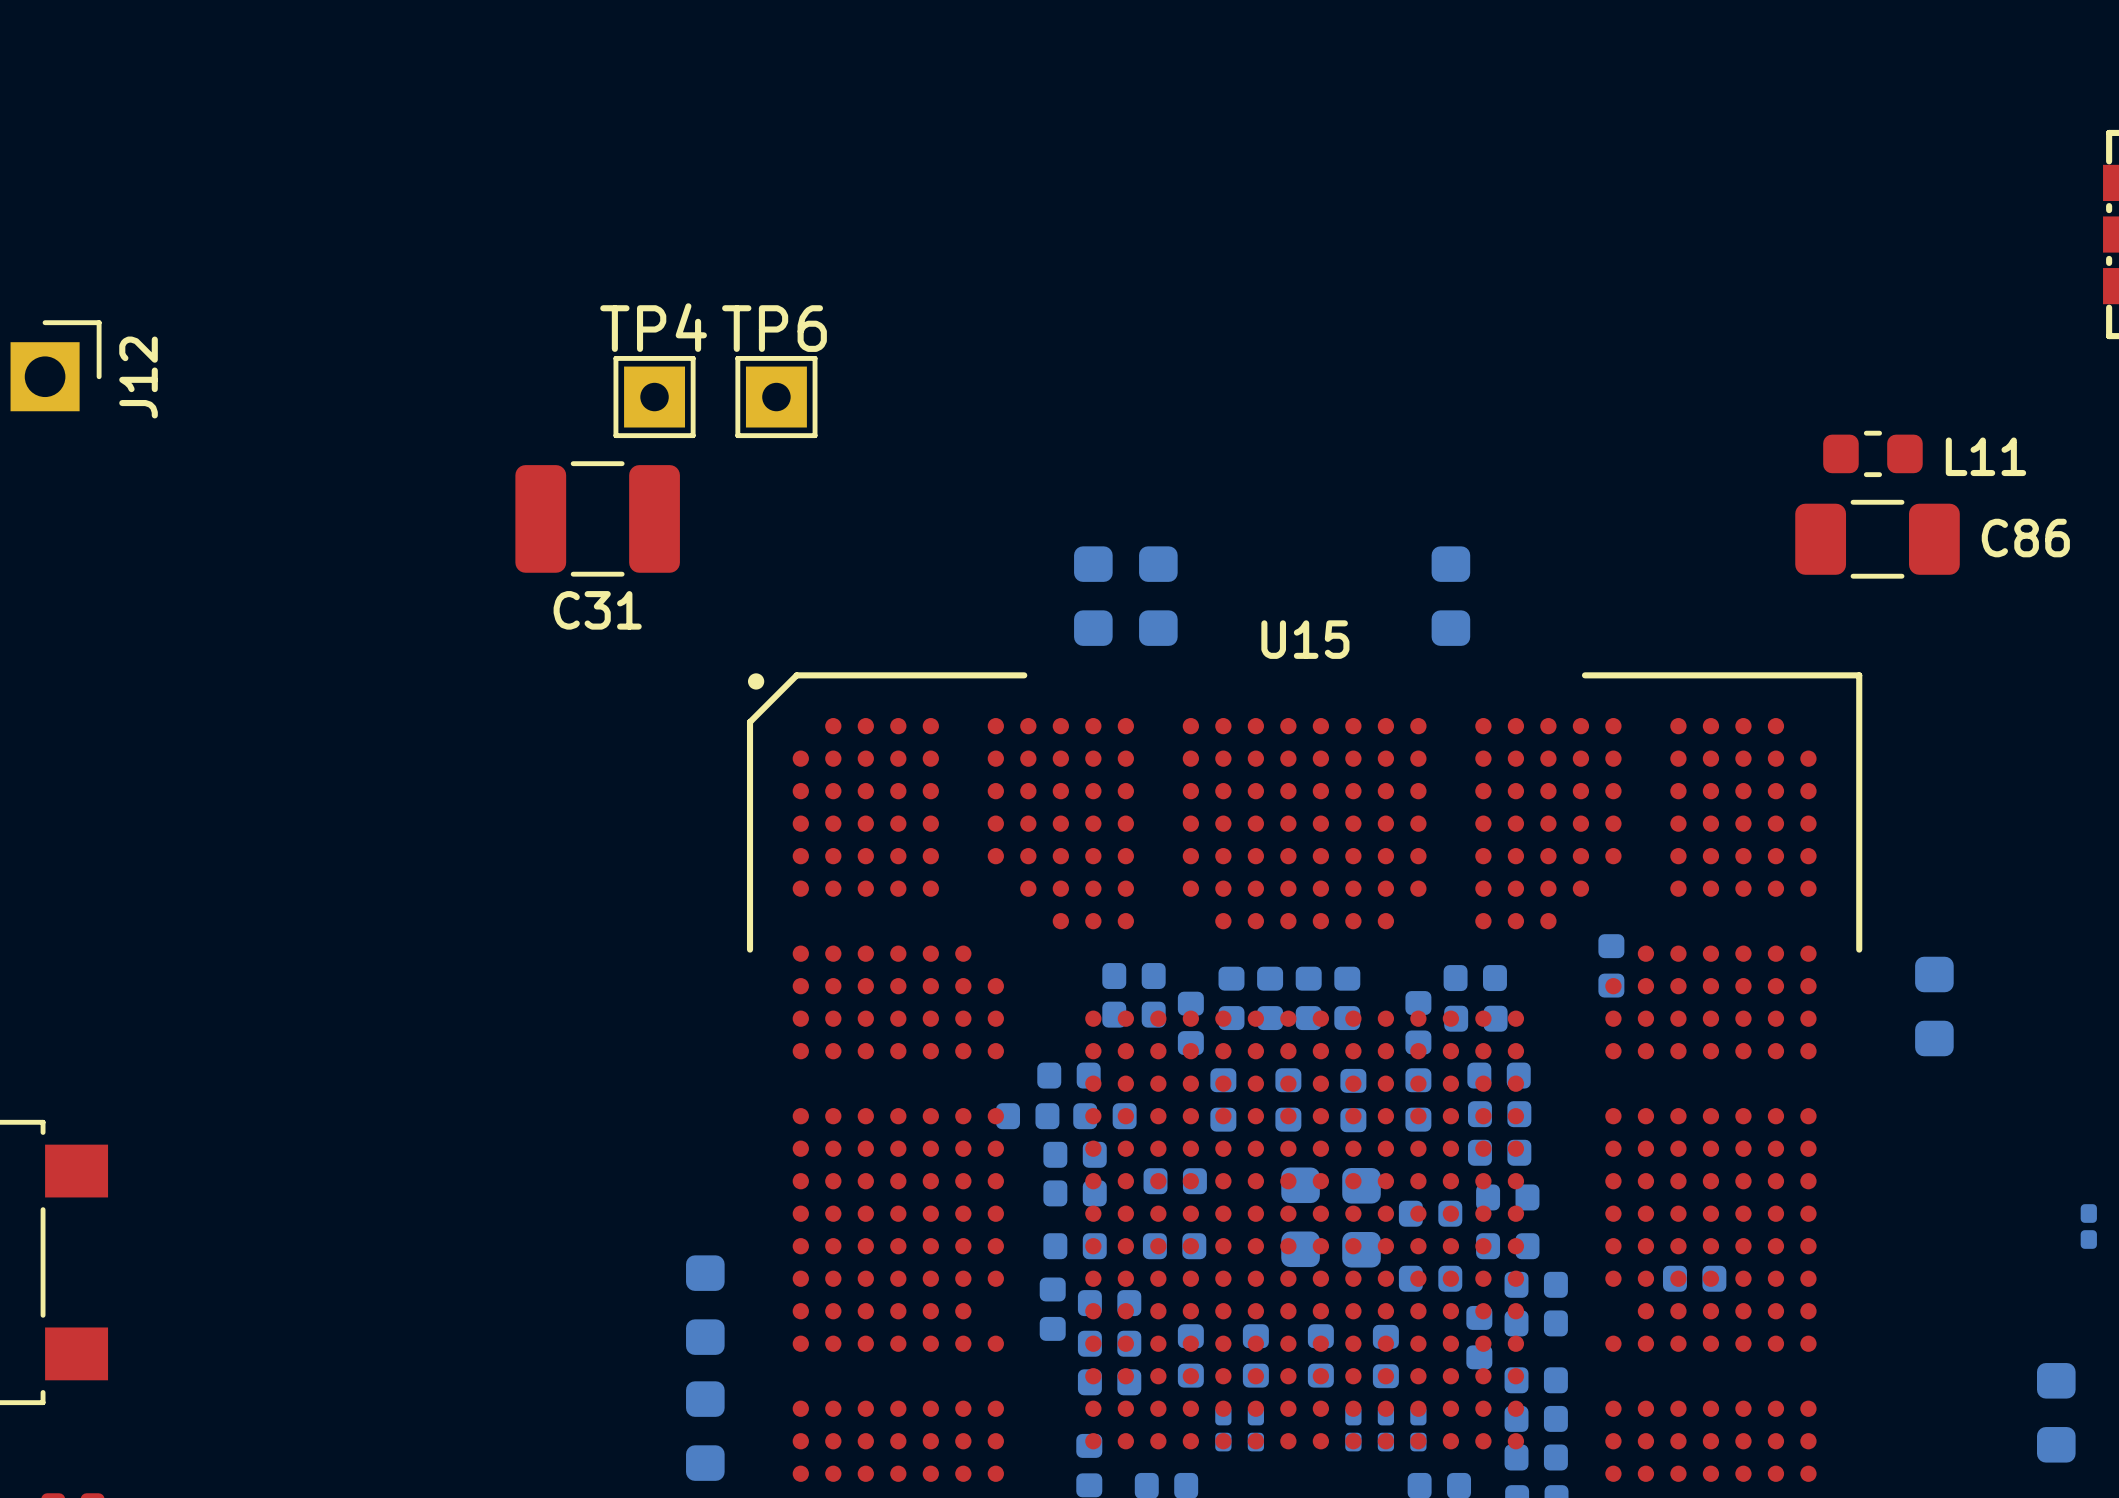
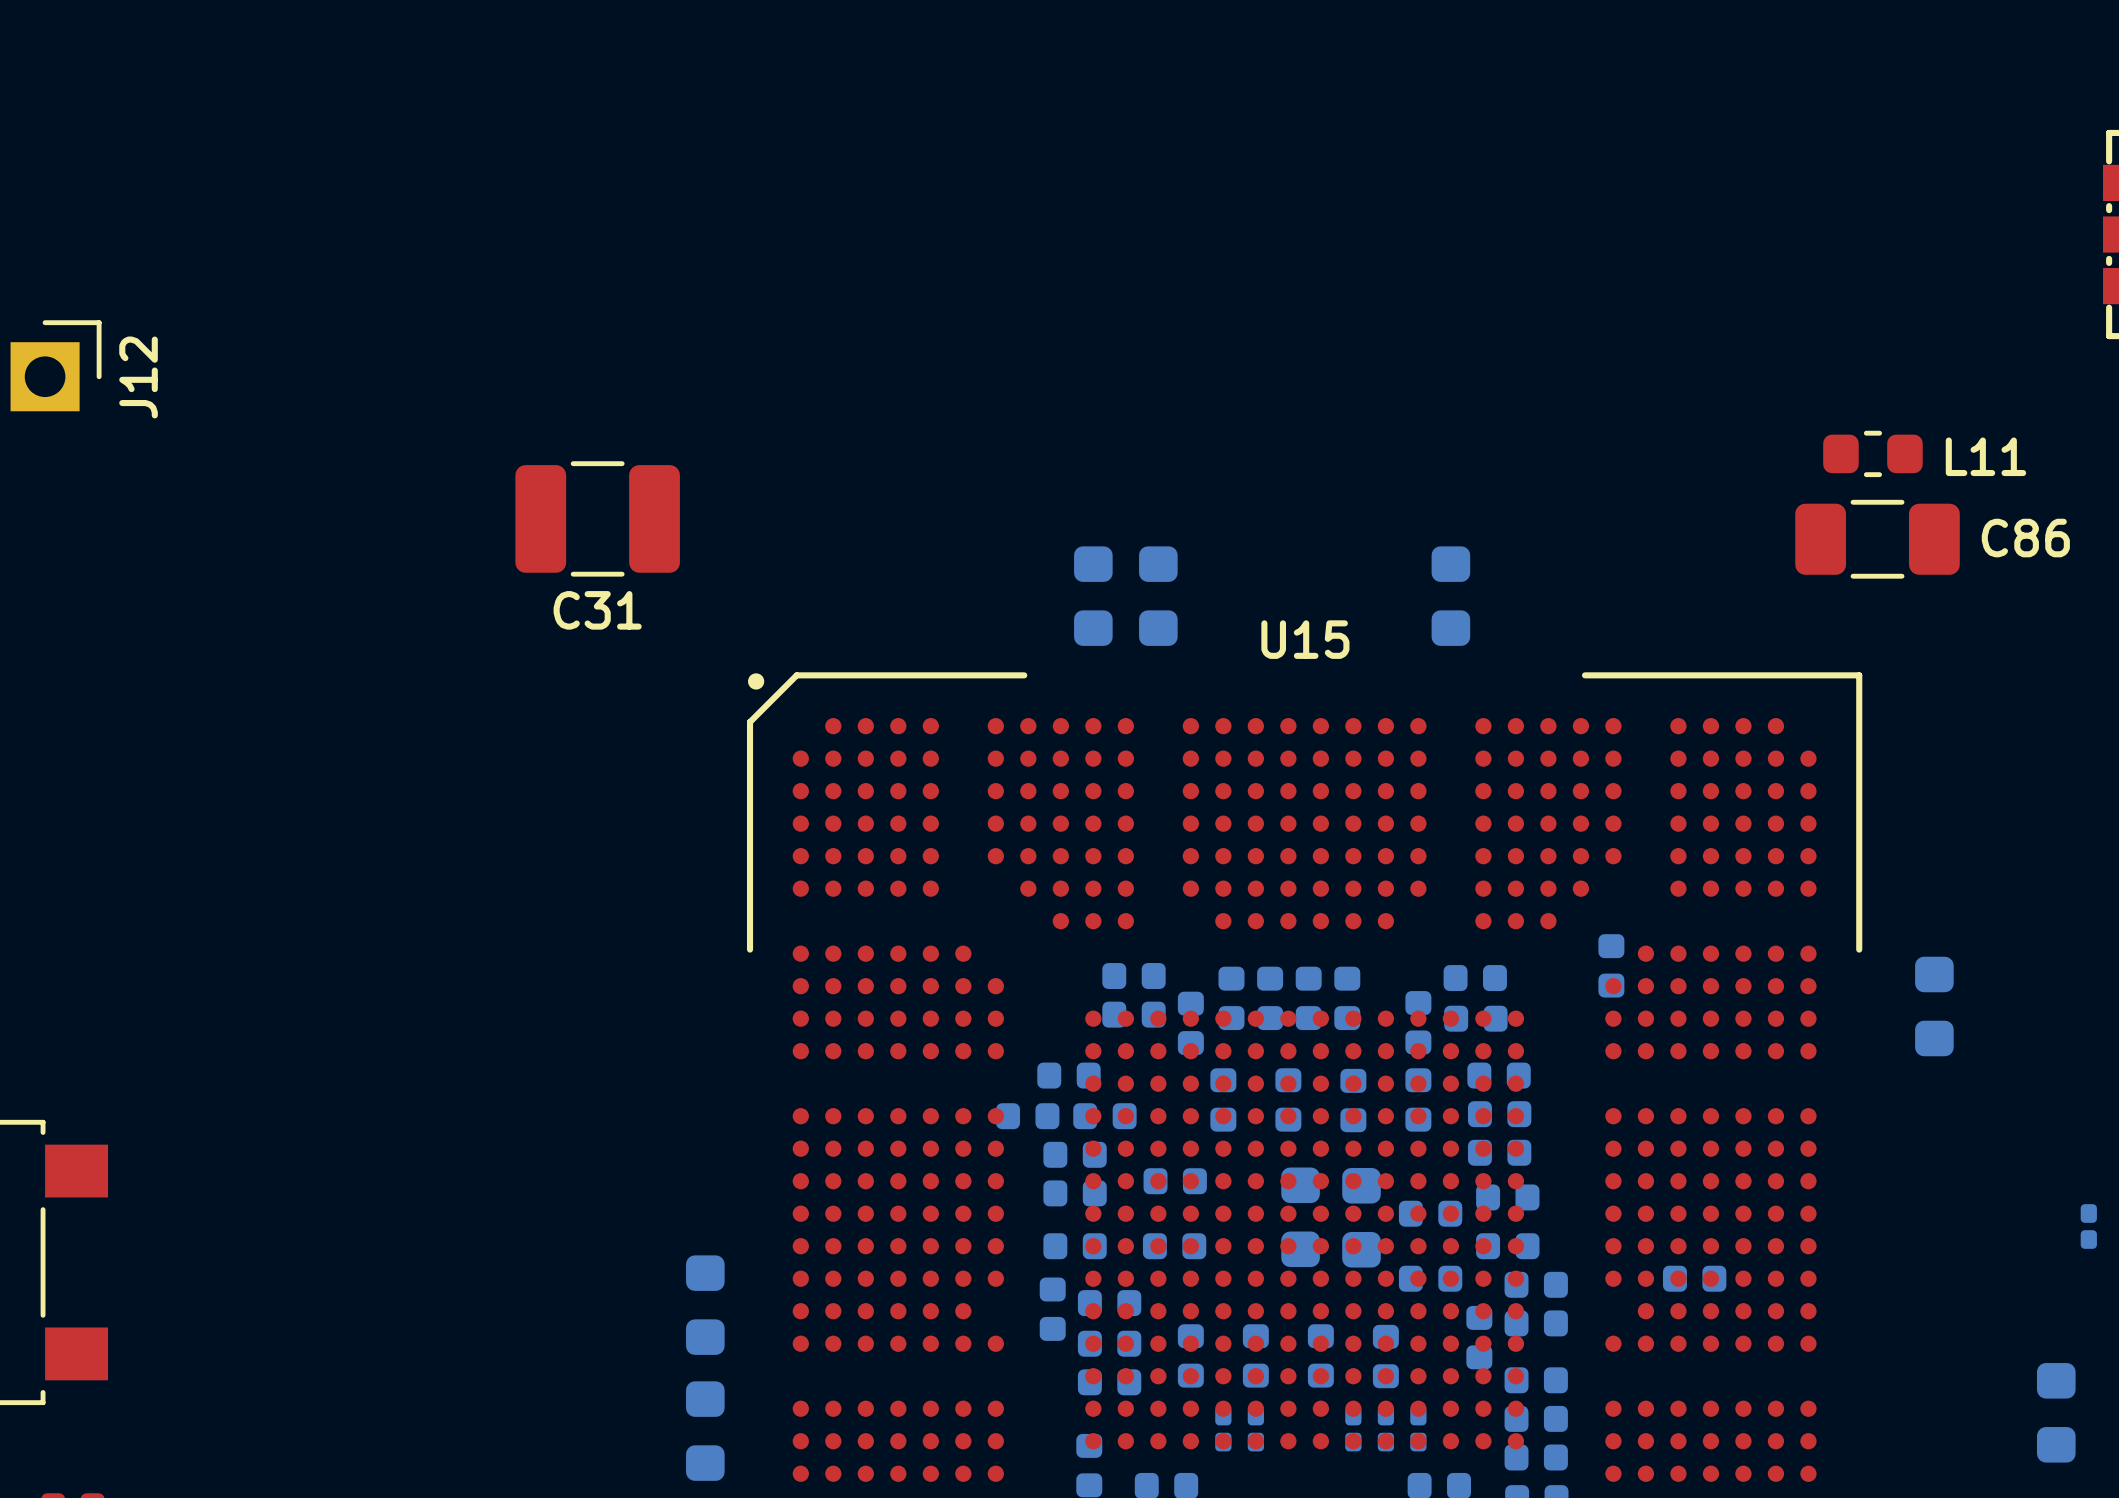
TP4: (654, 397) -> none
TP6: (776, 397) -> none

